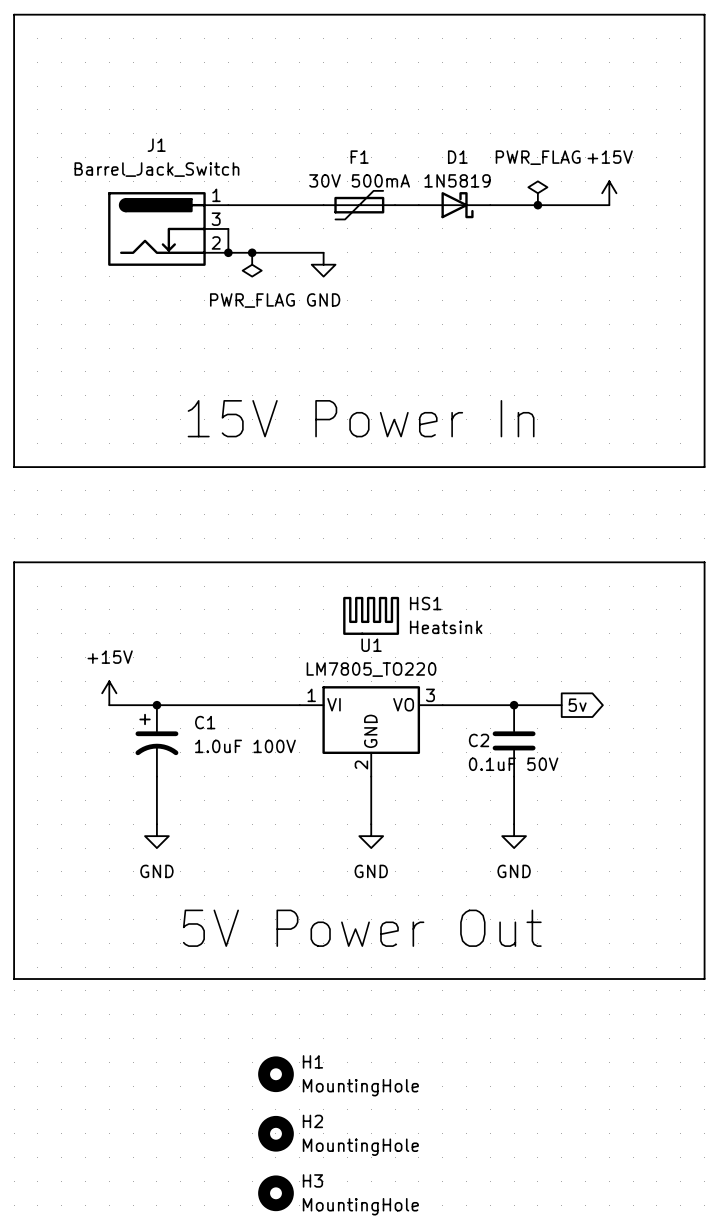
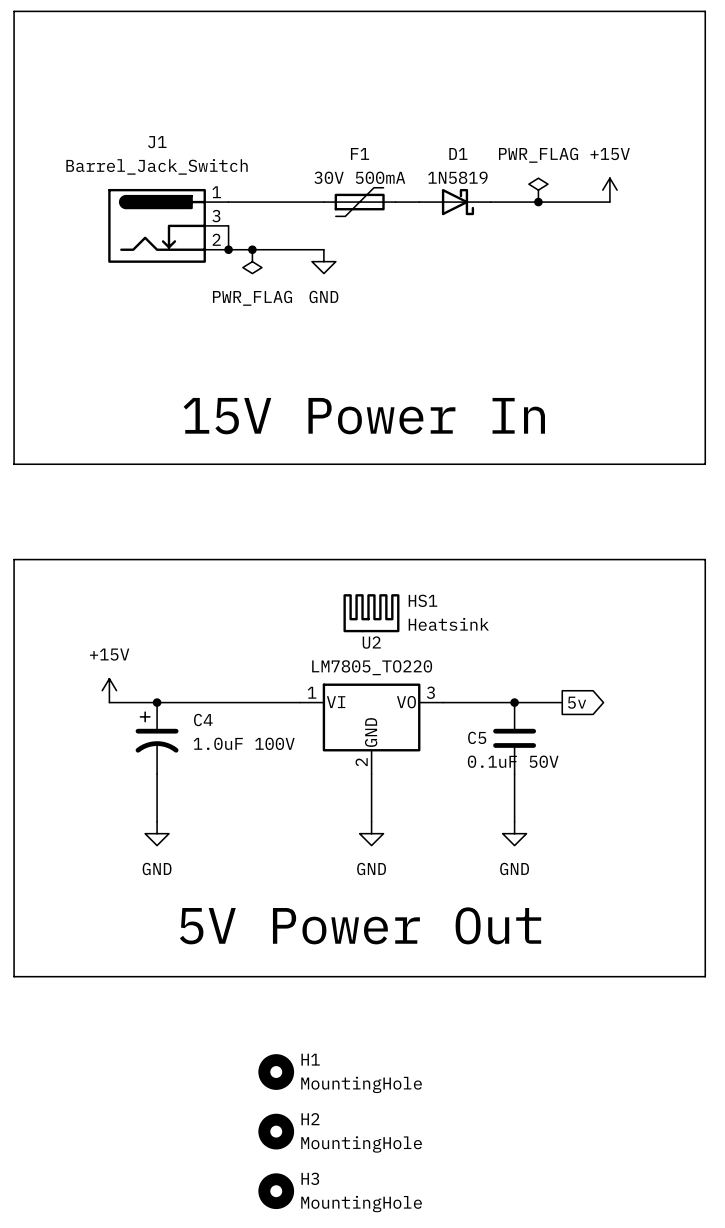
U1 name: U1 (371, 645) -> U2 (371, 642)
C1 name: C1 (205, 722) -> C4 (203, 720)
C2 name: C2 (479, 740) -> C5 (477, 737)

